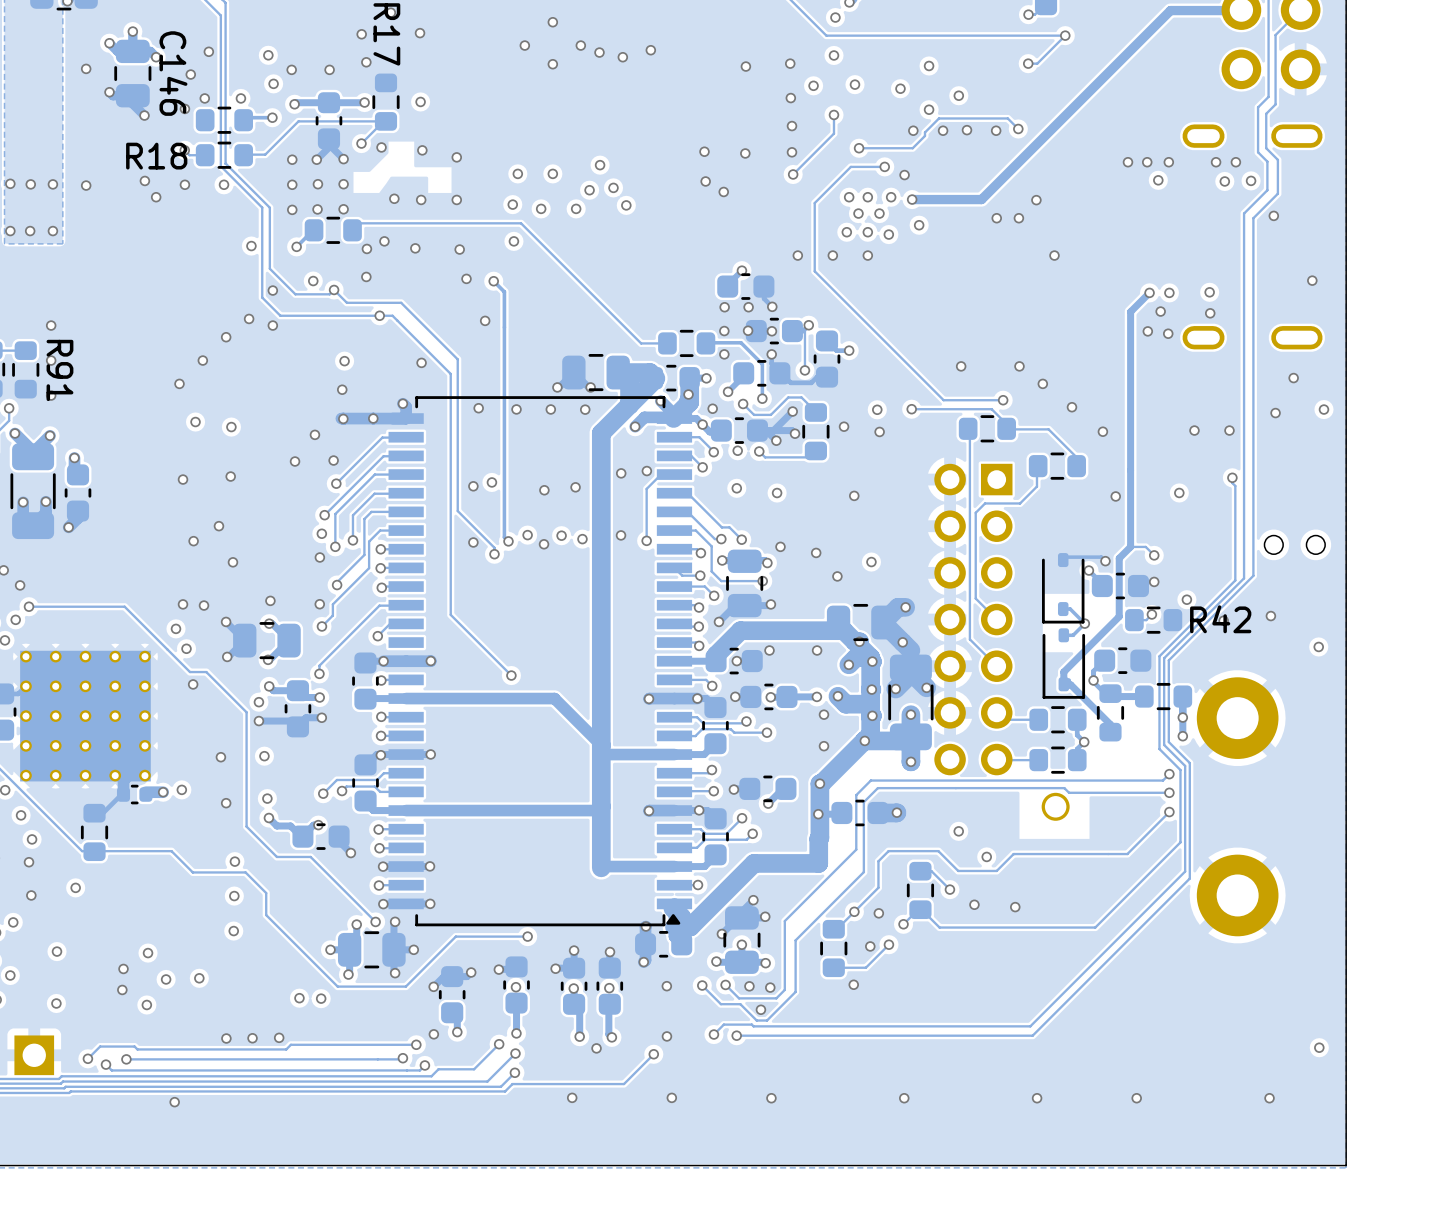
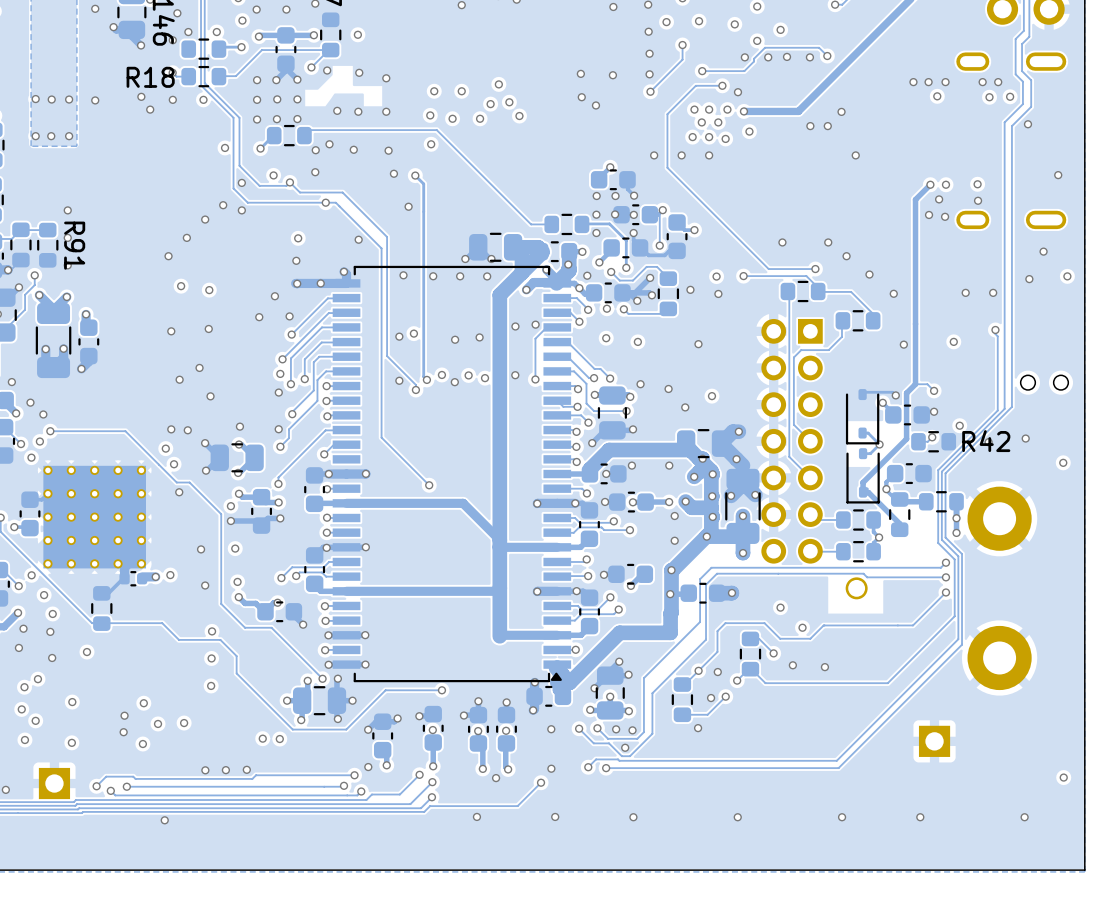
part: none -> (934, 741)

